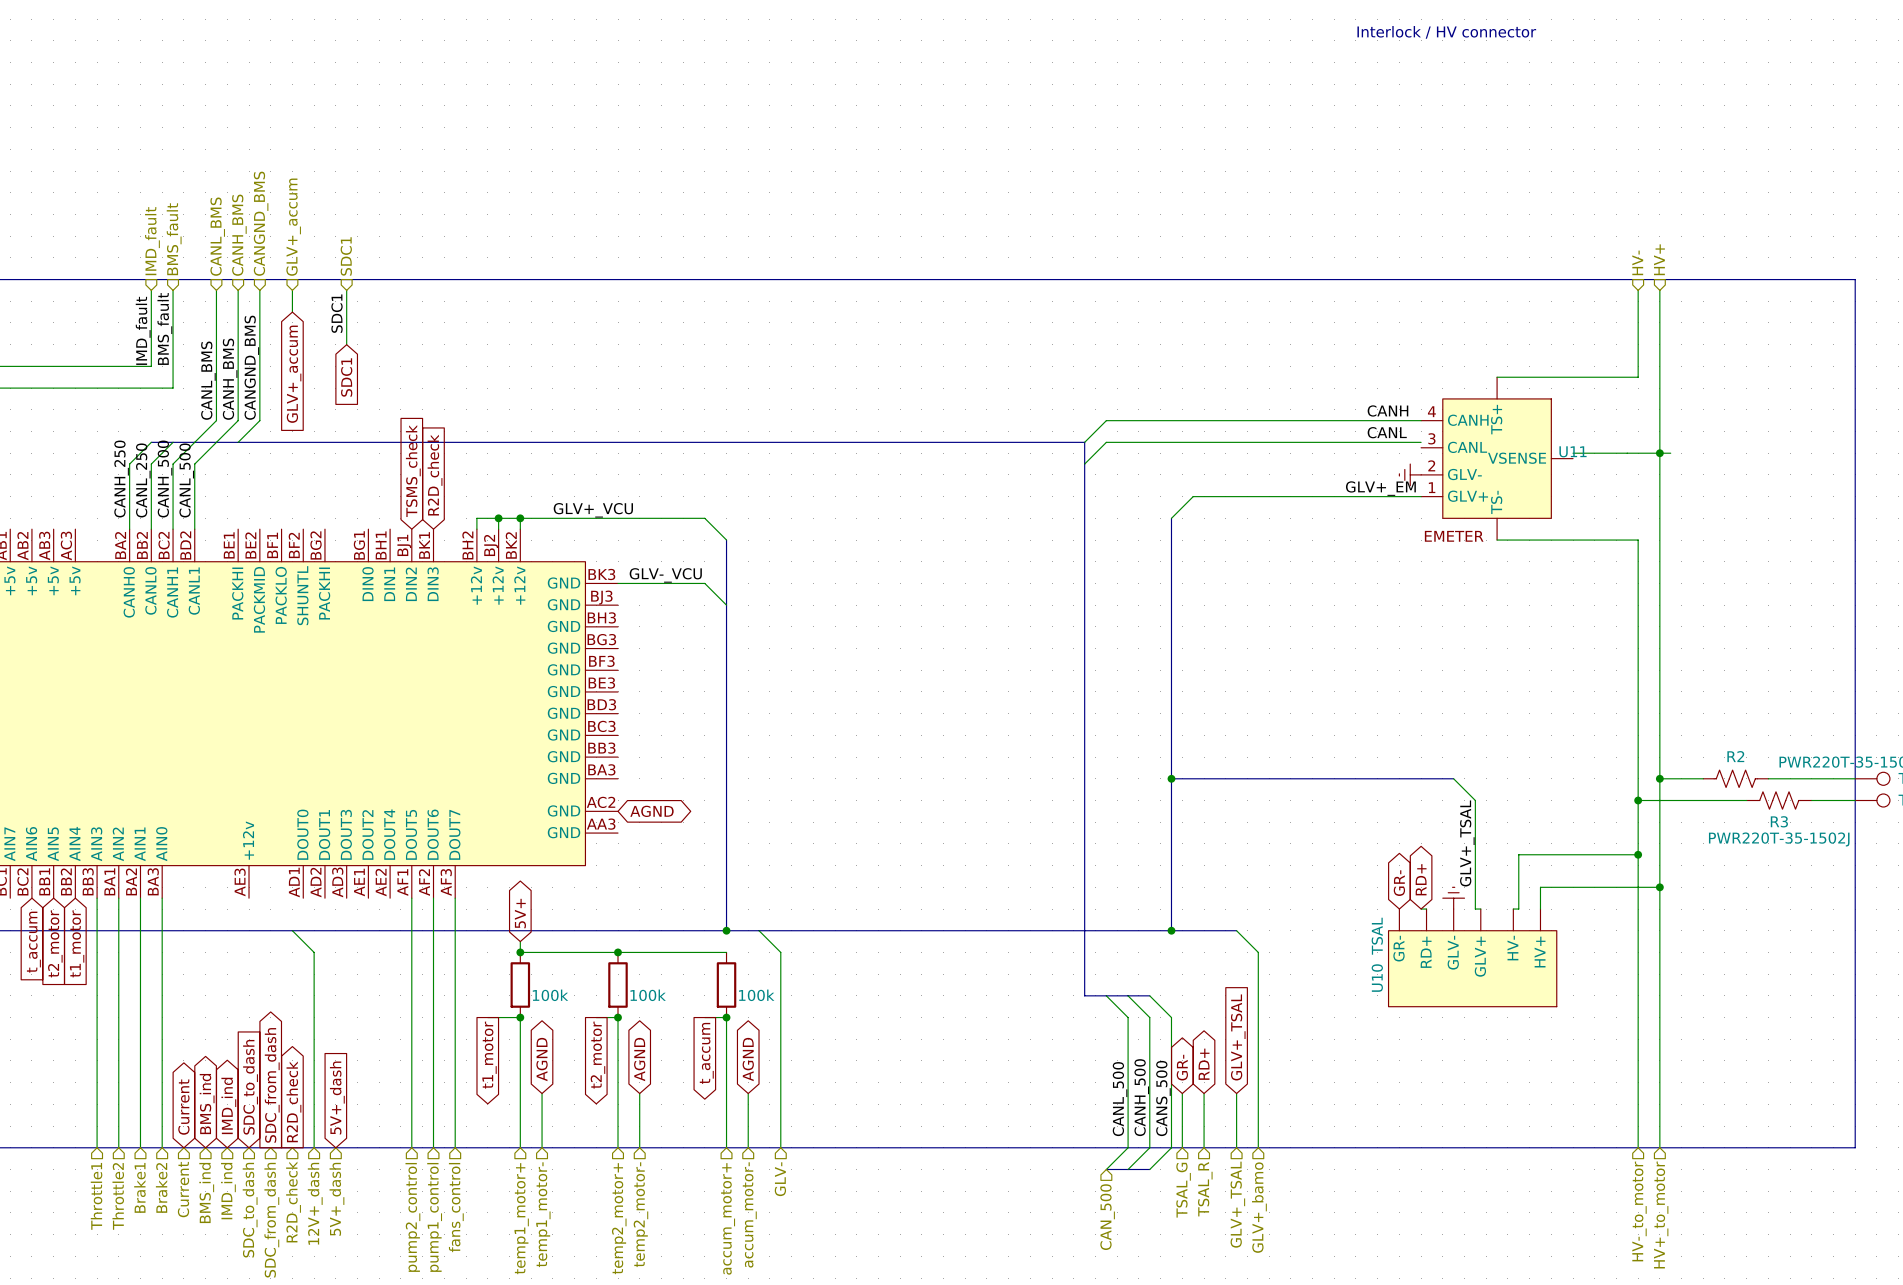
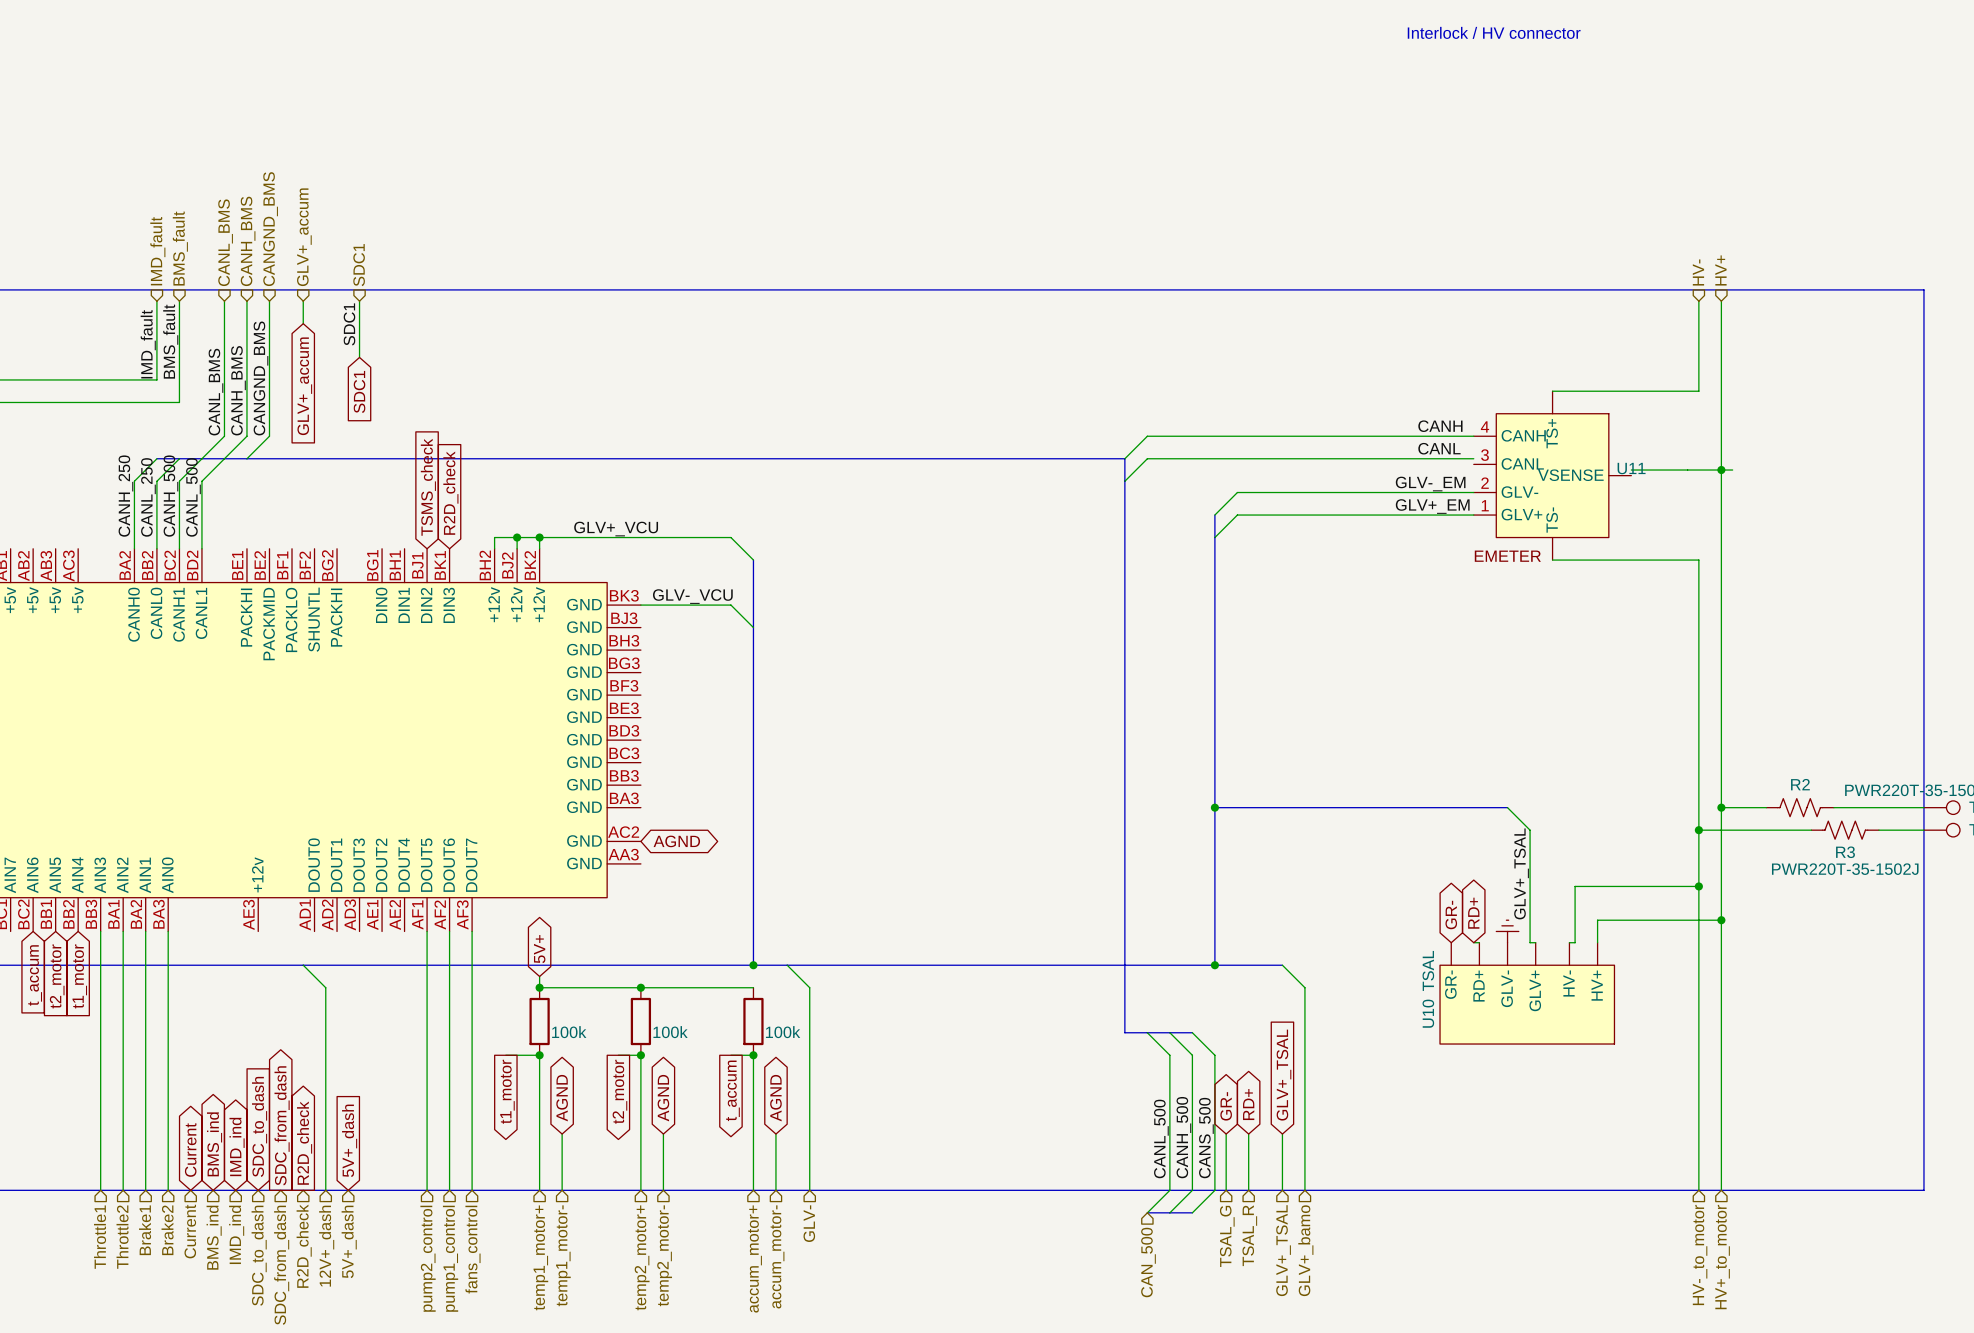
label: none -> GLV-_EM (1430, 484)
power symbol: (1410, 474) -> none
wire: none -> (1473, 492) (1237, 492) (1214, 515)
bus: none -> (1214, 515) (1214, 537)

